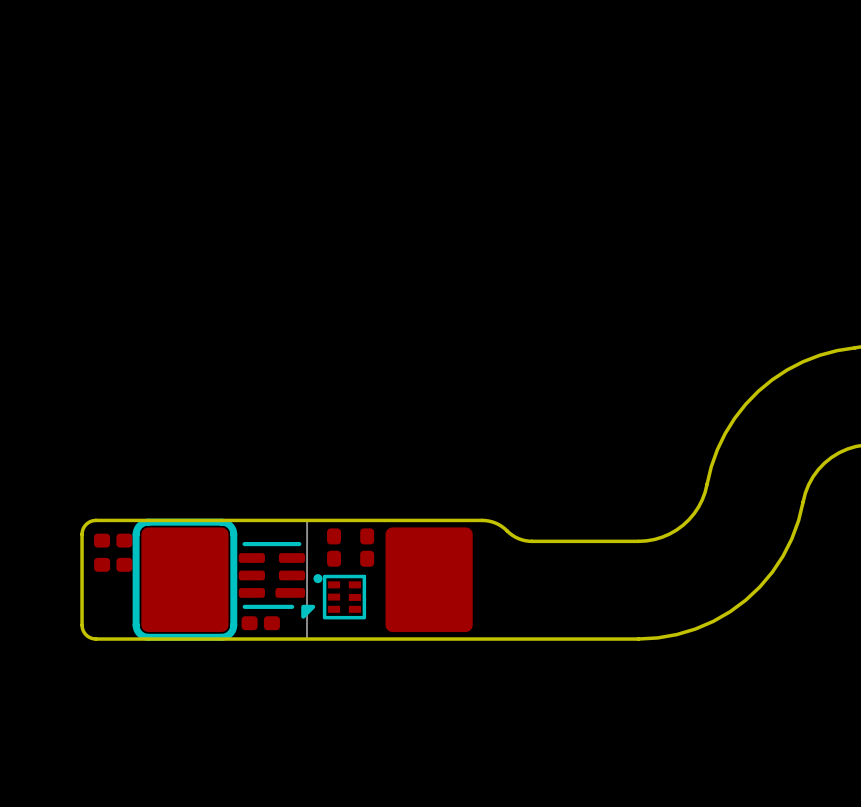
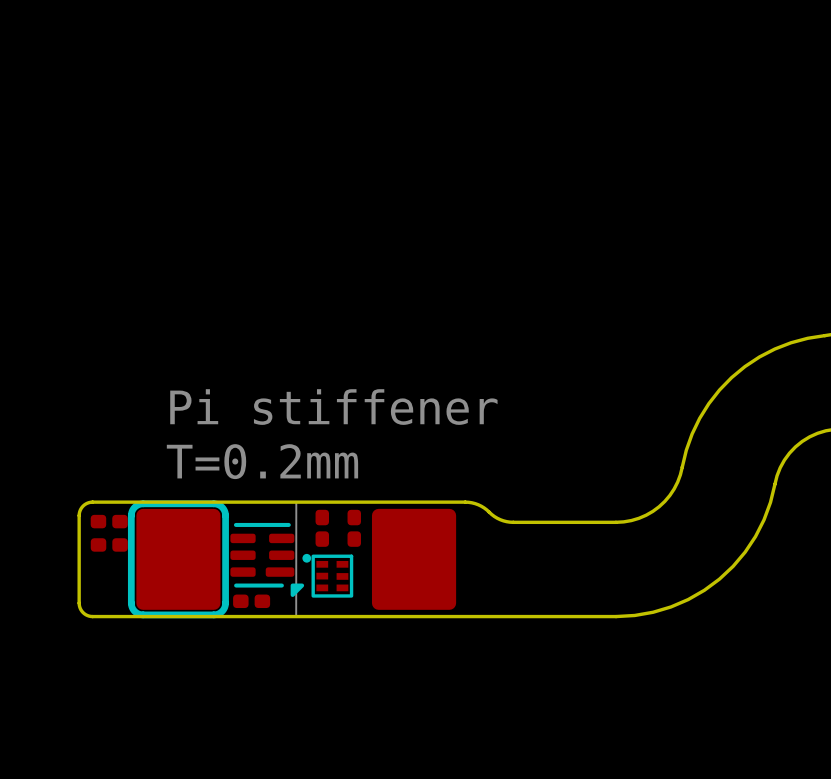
text: none -> Pi stiffener (333, 407)
text: none -> T=0.2mm (262, 461)

